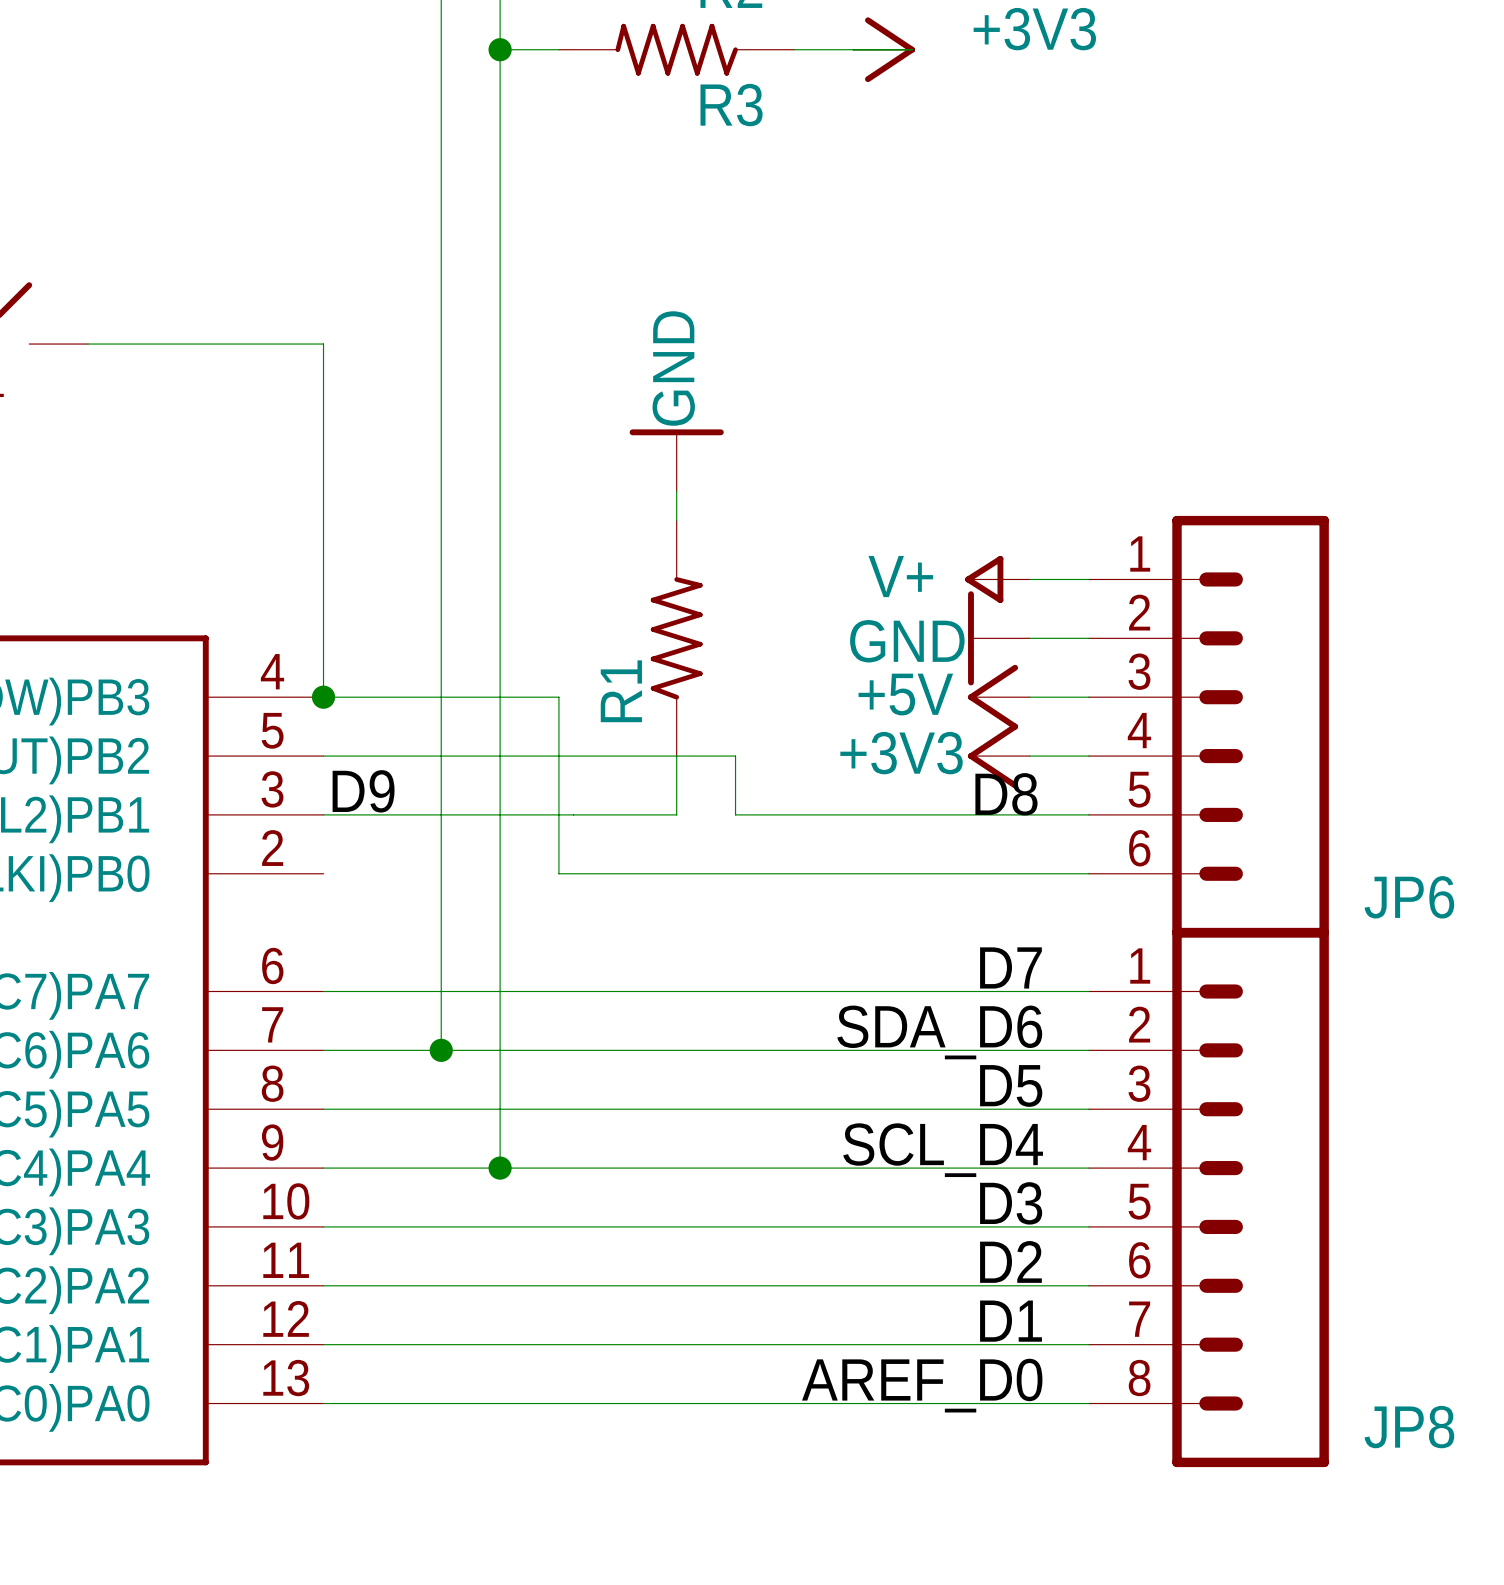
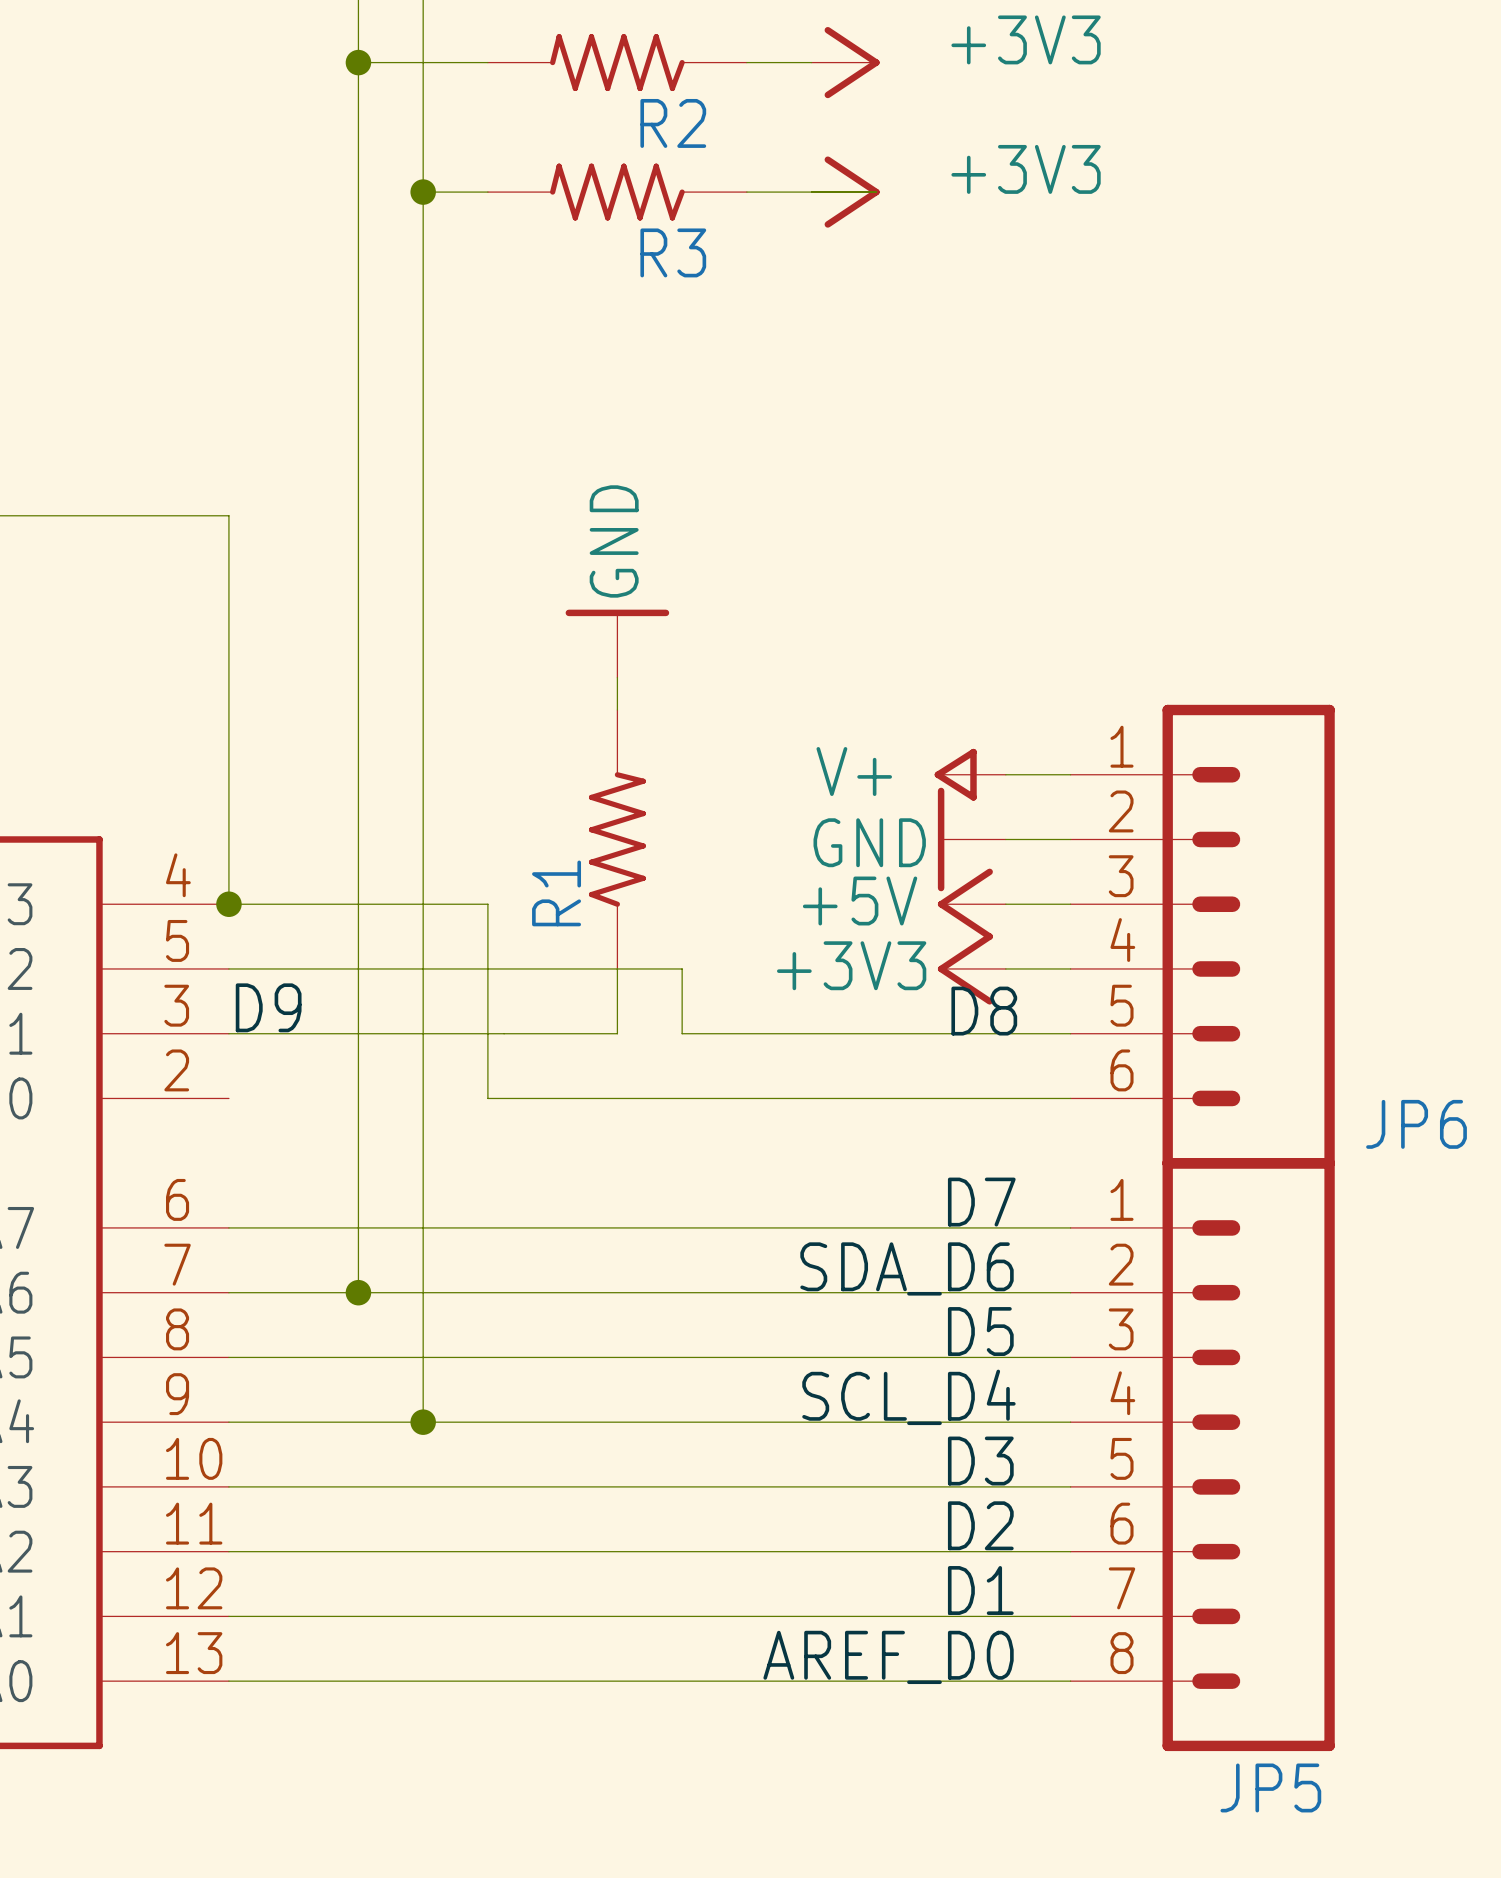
JP8 name: JP8 (1409, 1427) -> JP5 (1270, 1787)

